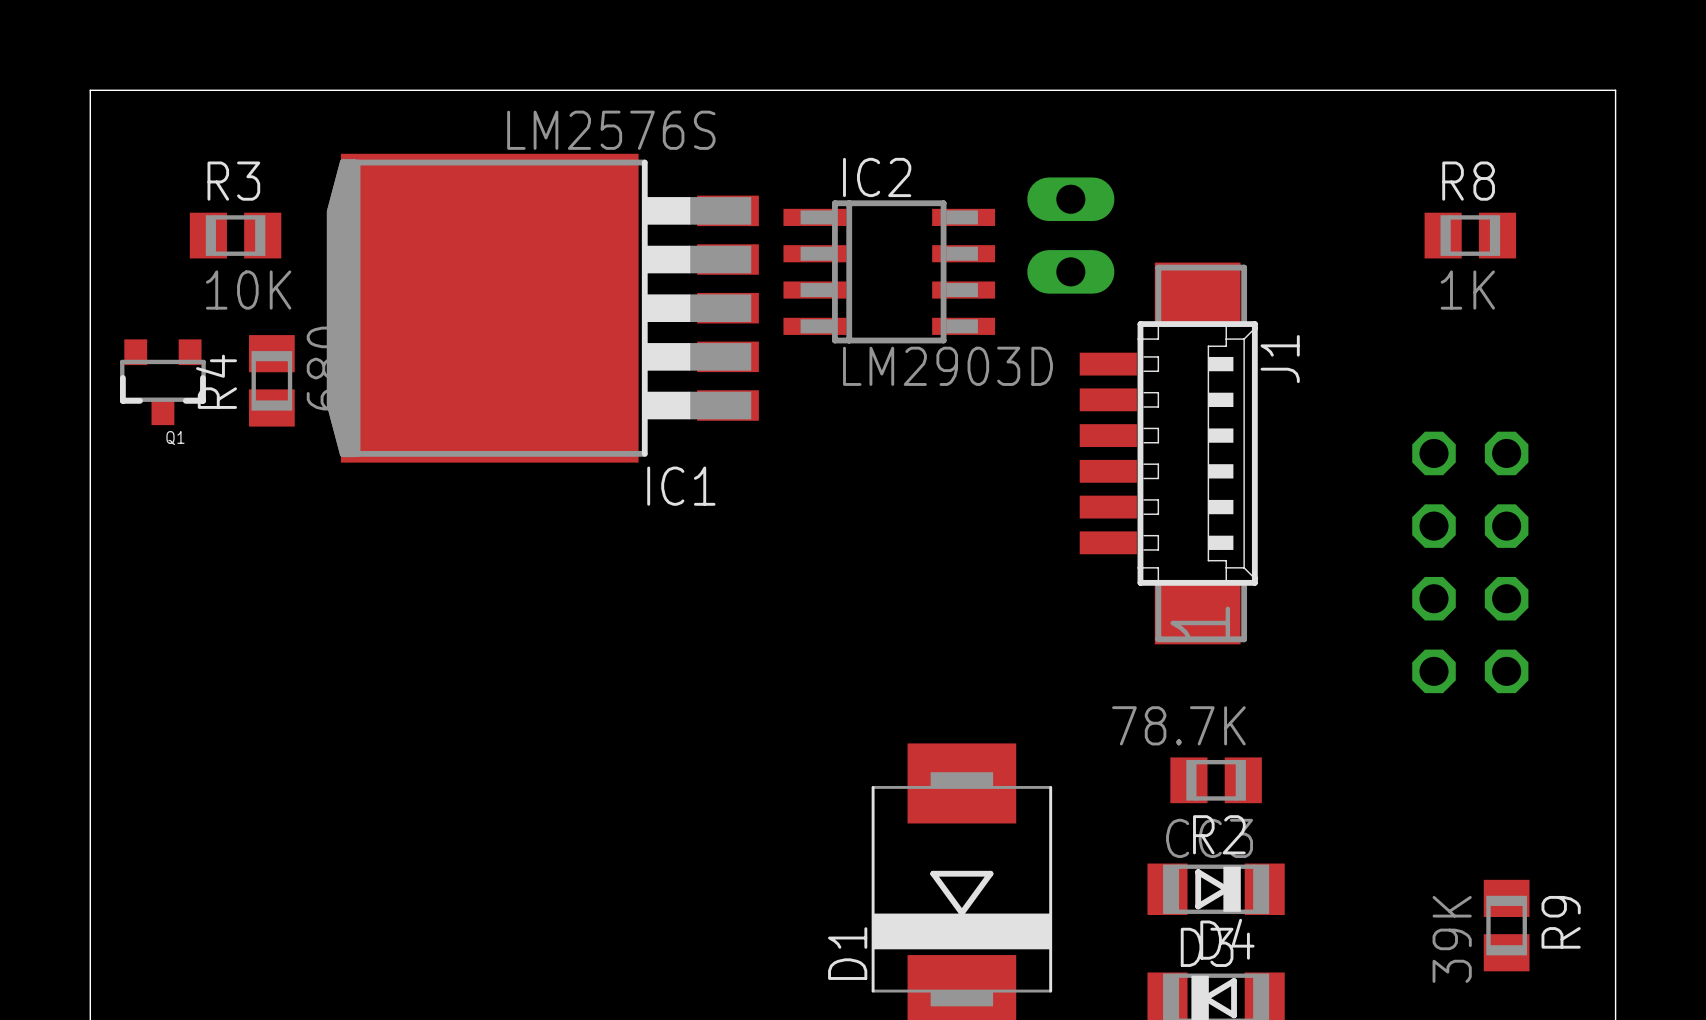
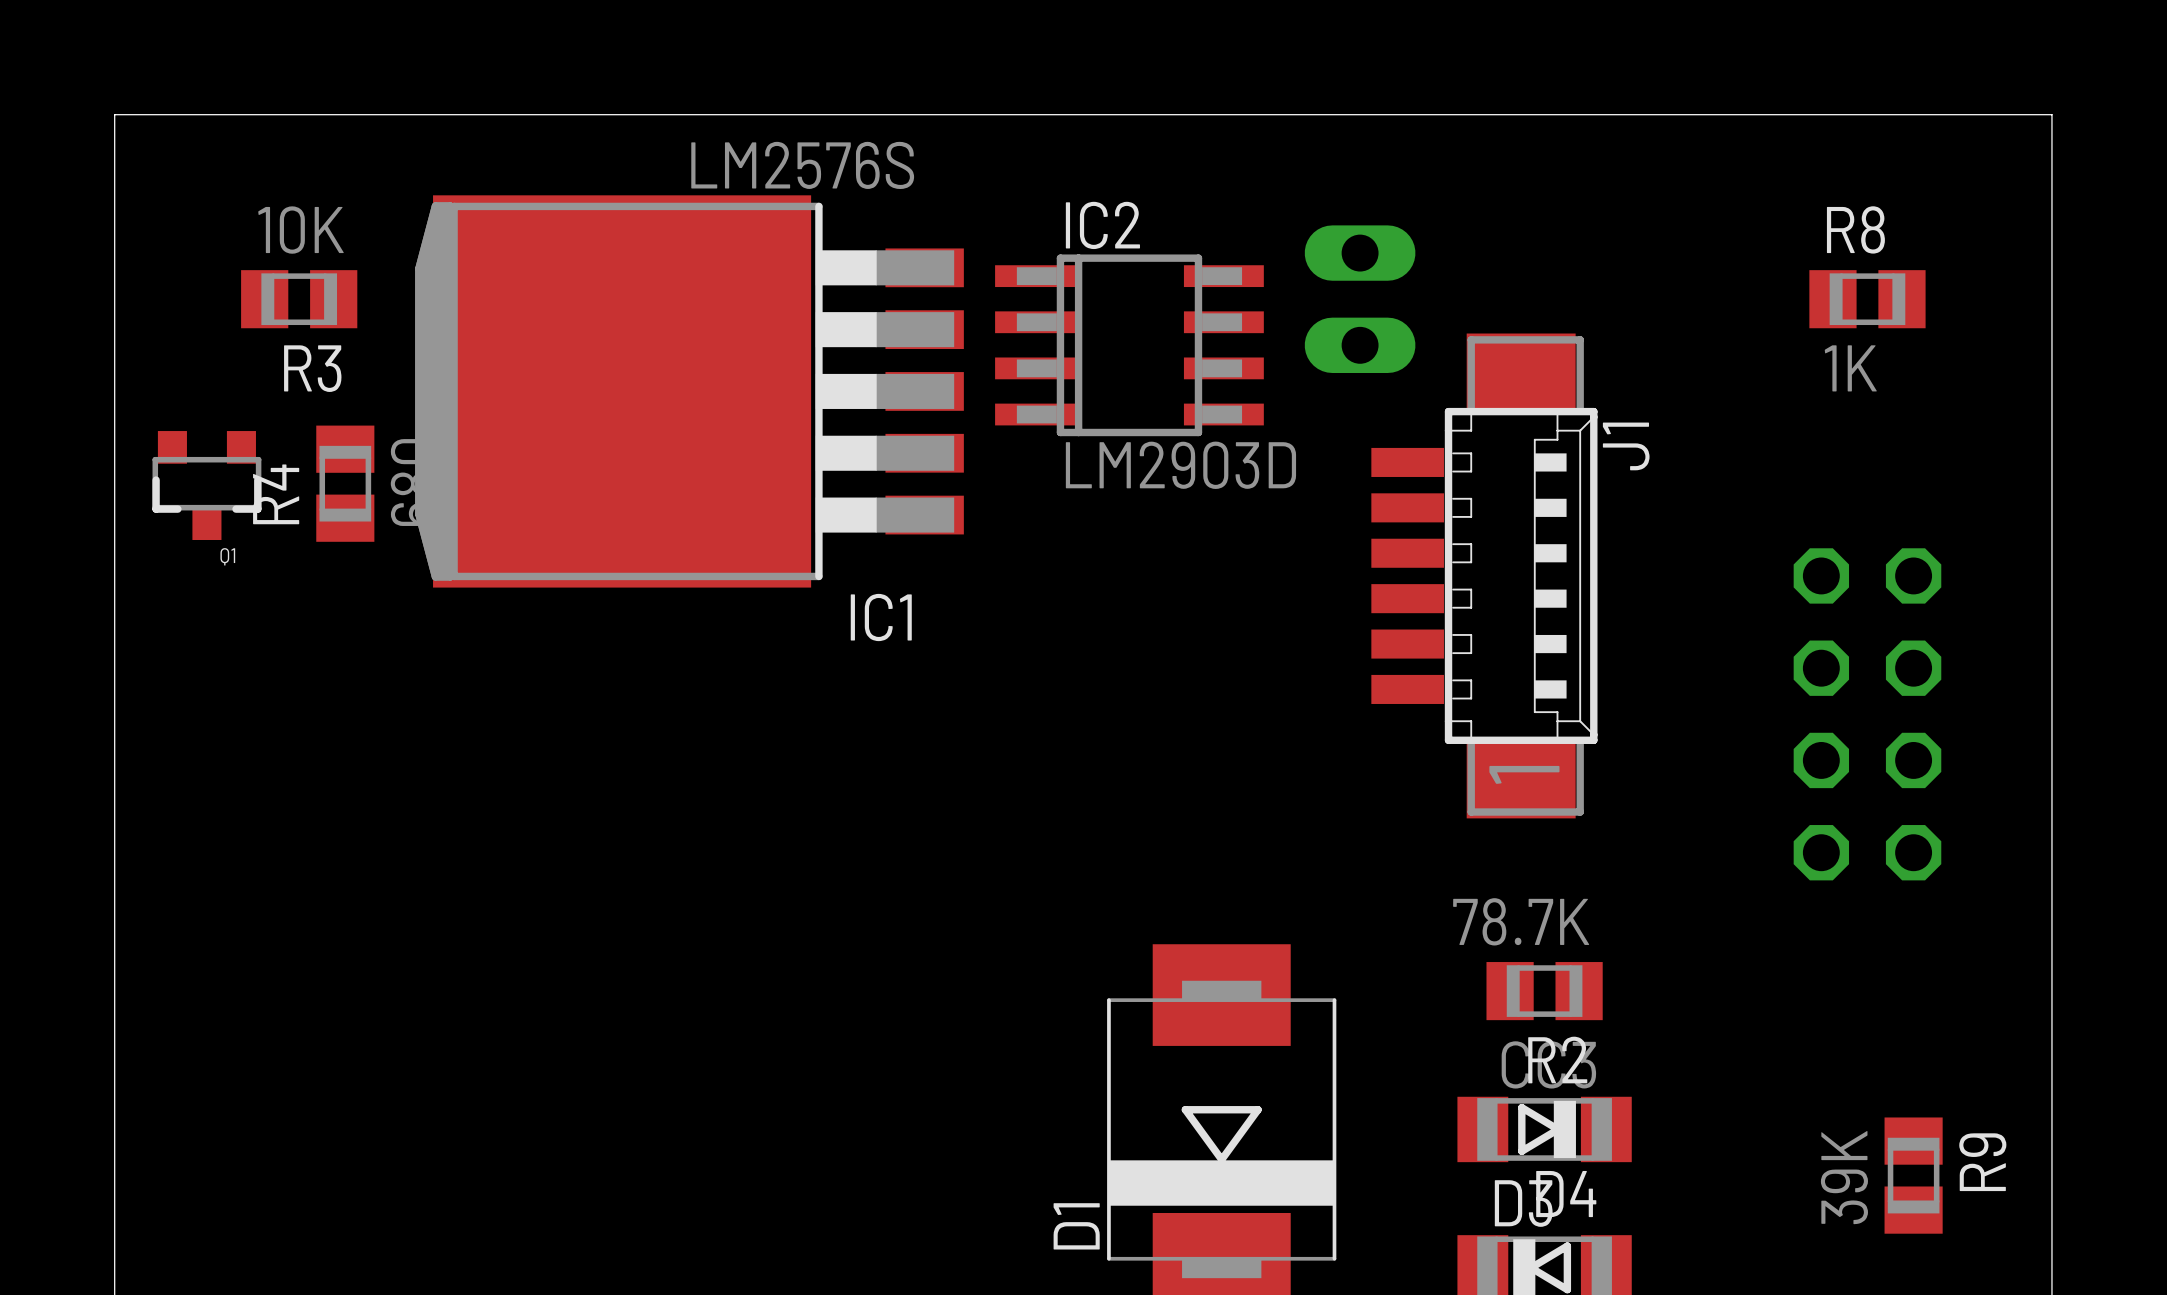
R3 name position: R3 (233, 181) -> R3 (312, 368)
R3 value position: 10K (248, 290) -> 10K (300, 230)

